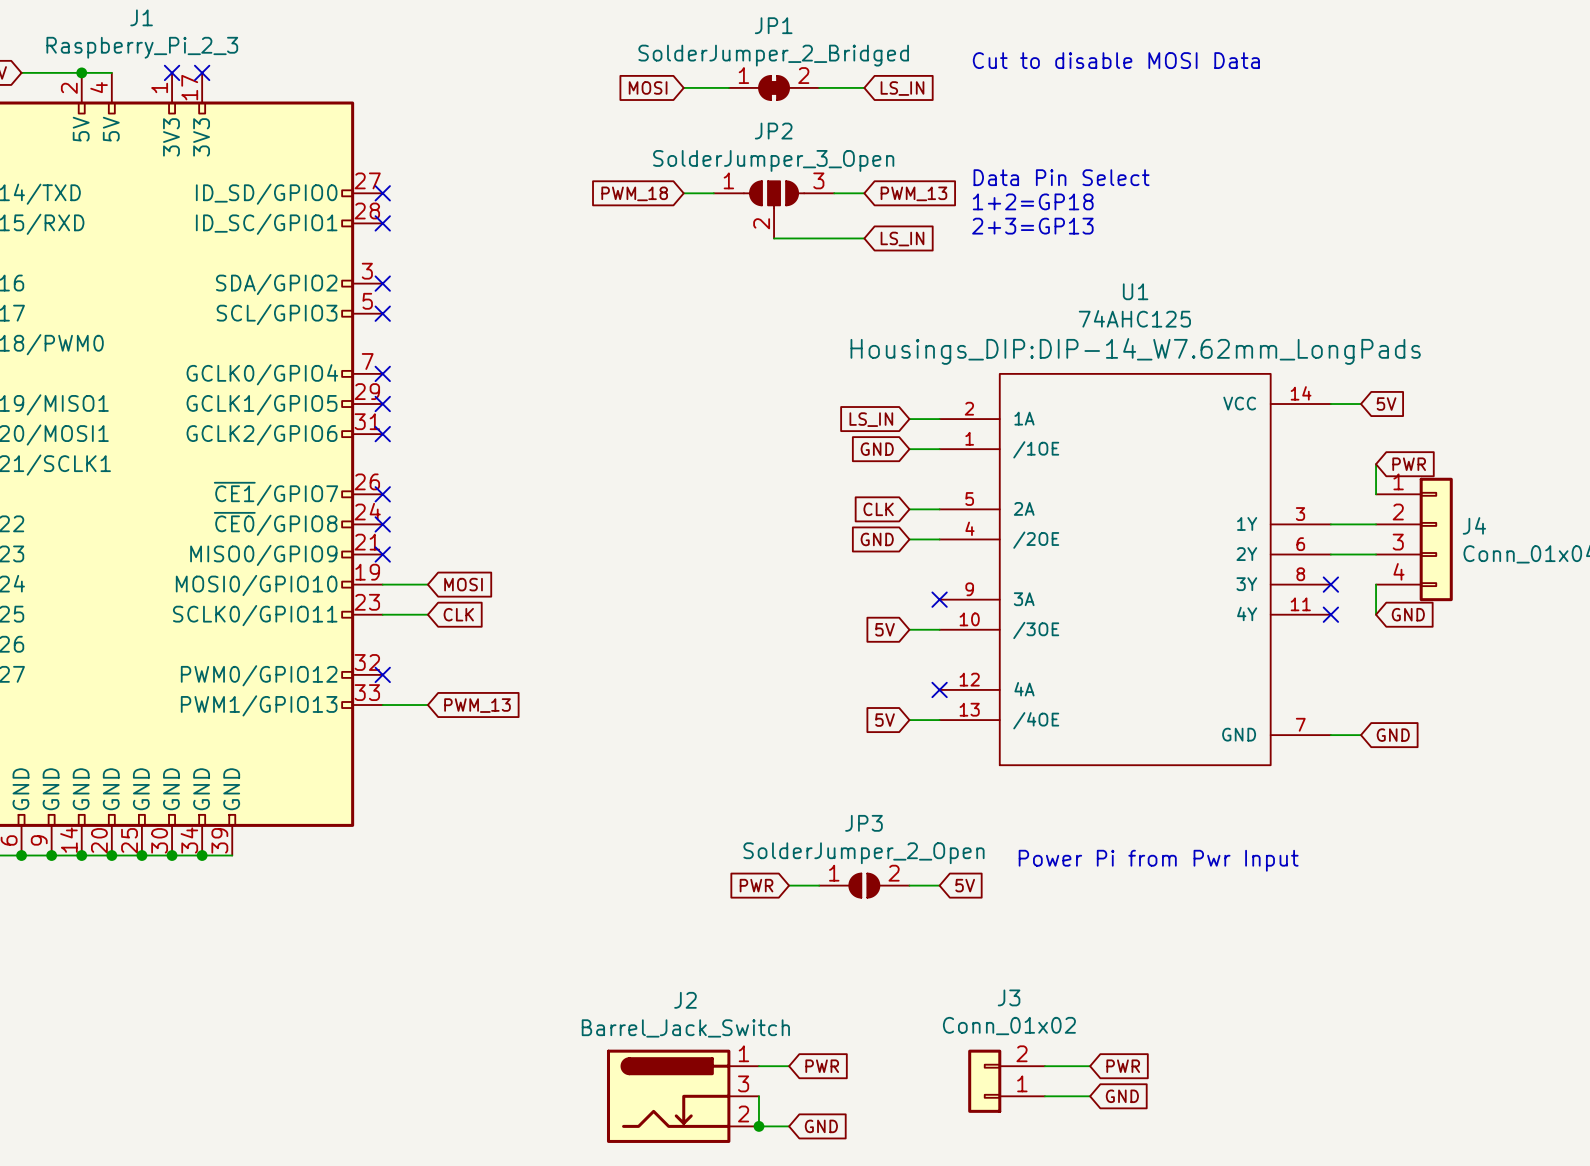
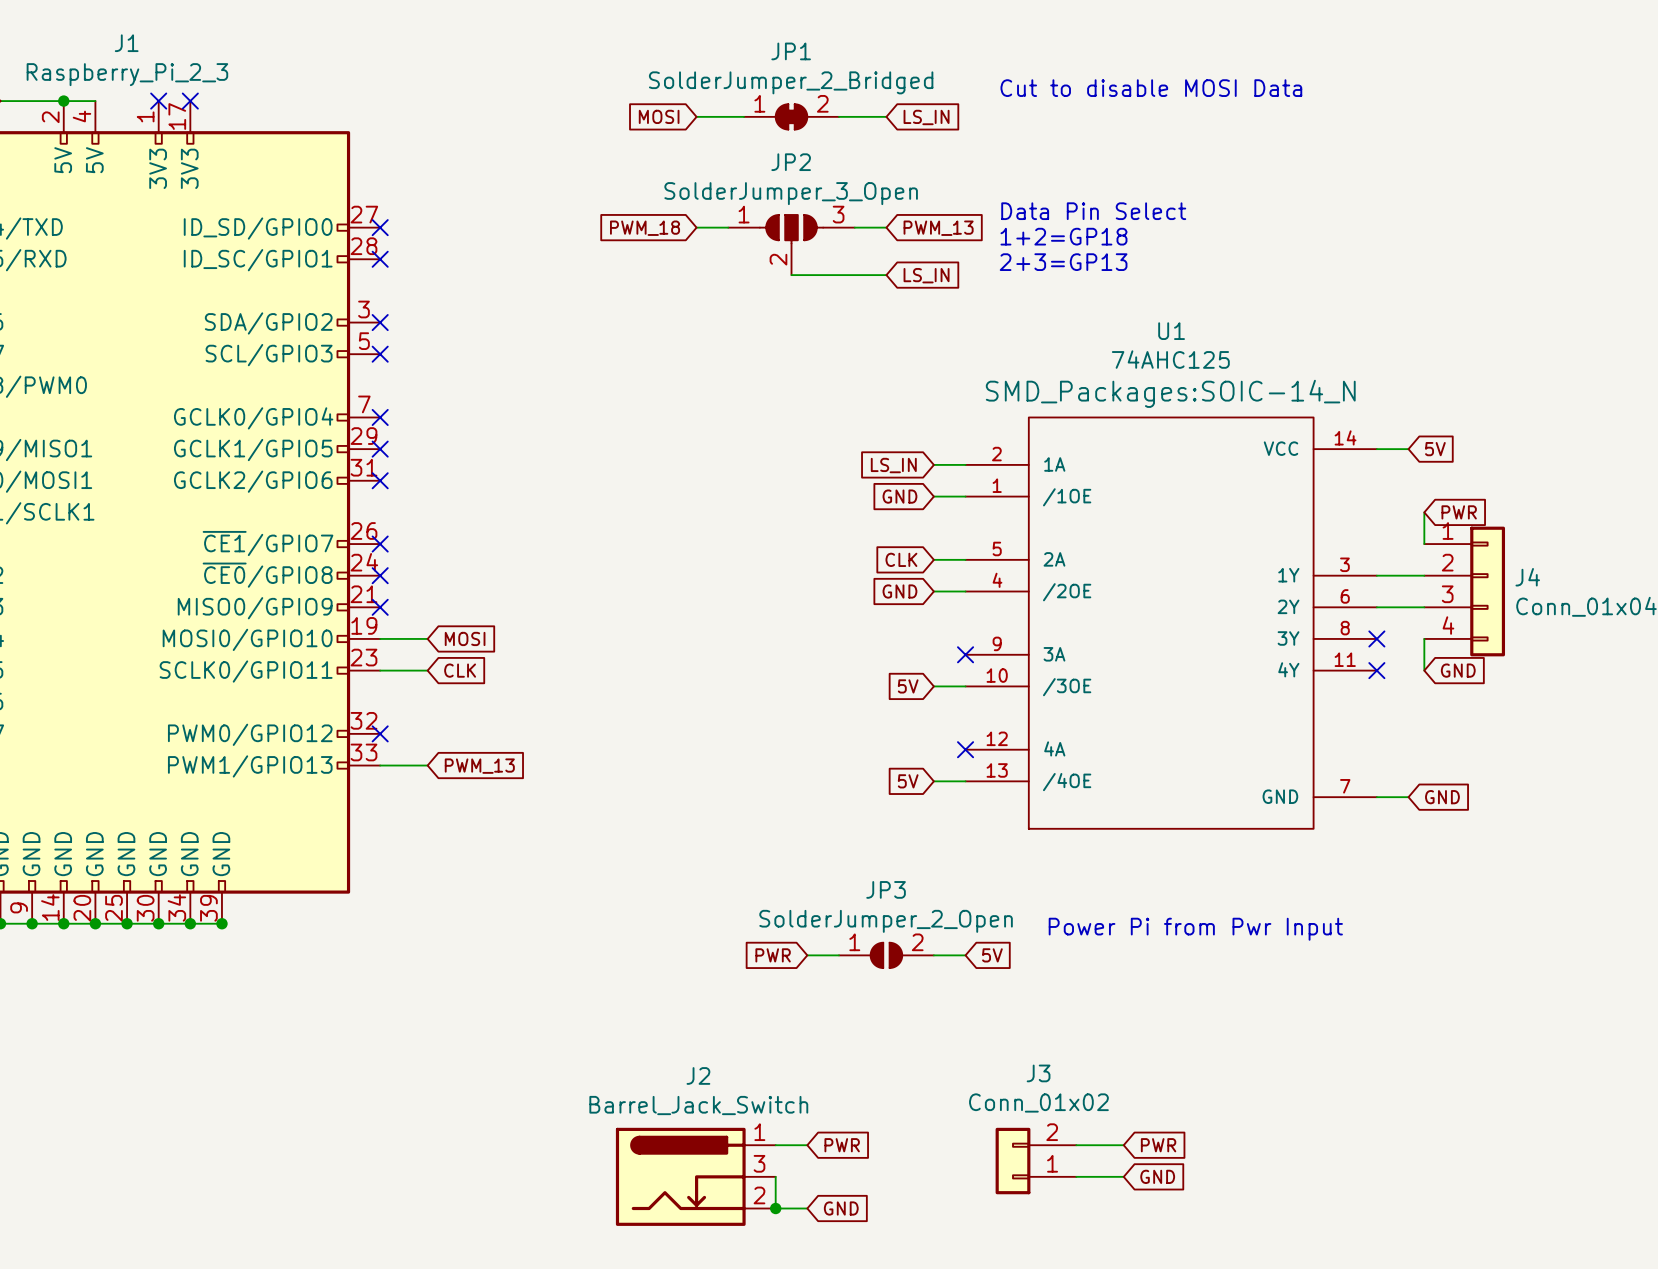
U1 text: Housings_DIP:DIP-14_W7.62mm_LongPads (1135, 351) -> SMD_Packages:SOIC-14_N (1170, 393)
junction: none -> (221, 923)

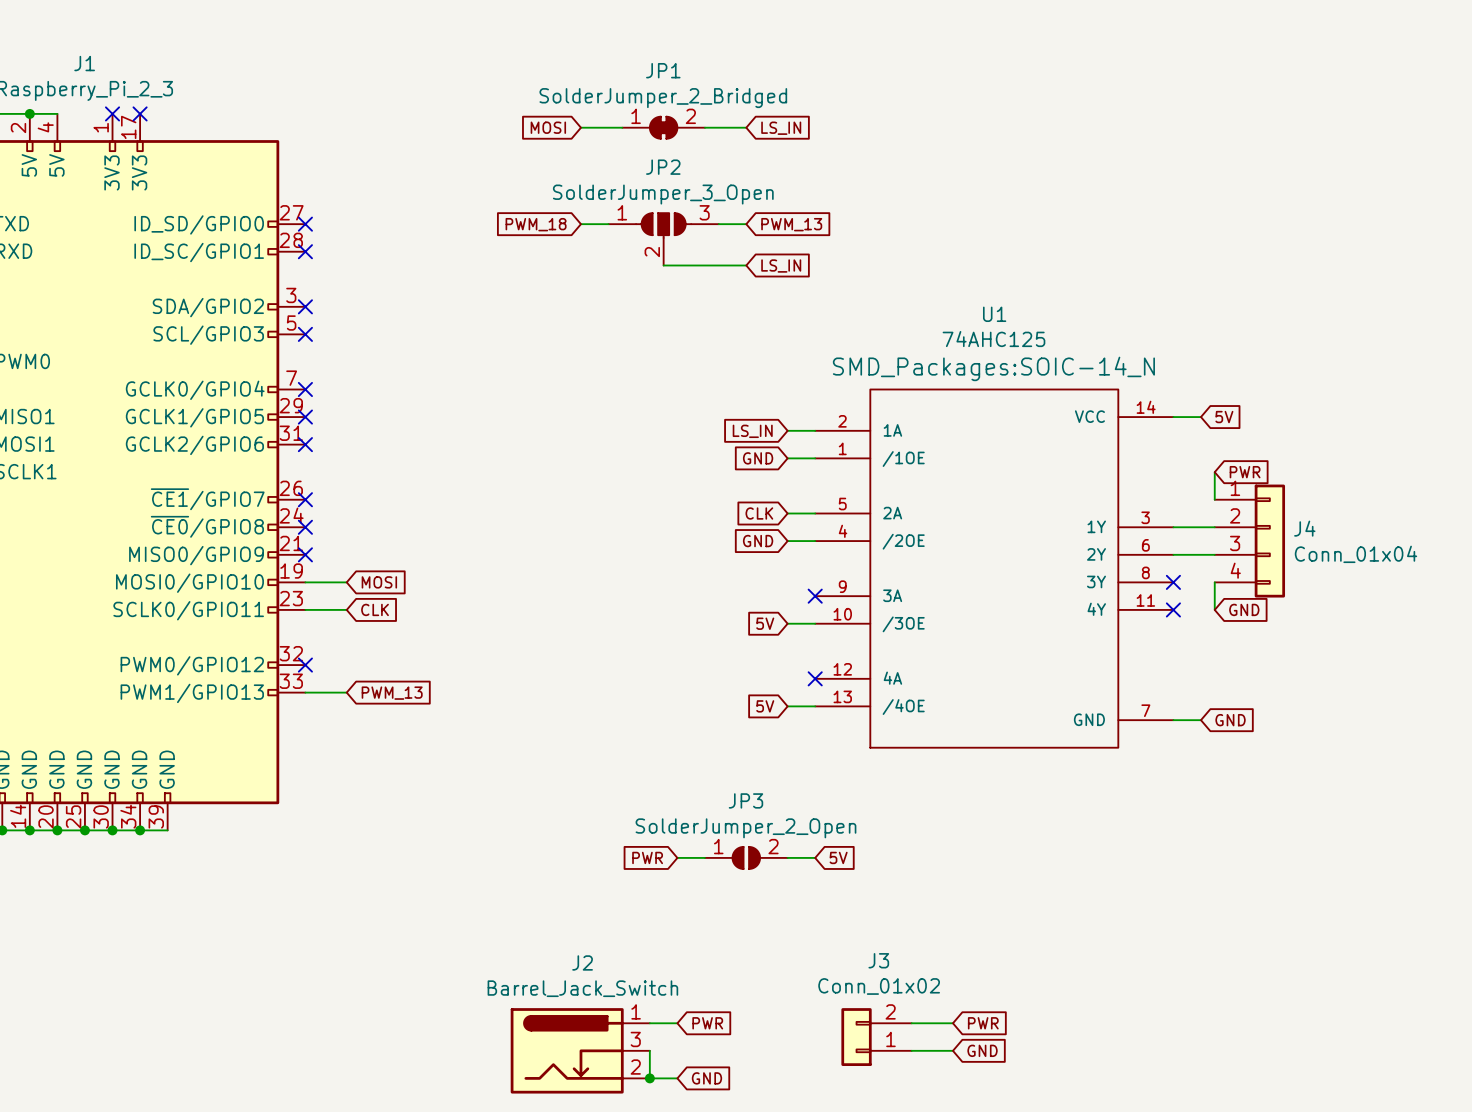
text: Cut to disable MOSI Data (1151, 88) -> none
text: Data Pin Select (1093, 211) -> none
text: 1+2=GP18 (1063, 236) -> none
text: 2+3=GP13 (1063, 262) -> none
junction: (221, 923) -> none
text: Power Pi from Pwr Input (1195, 929) -> none

